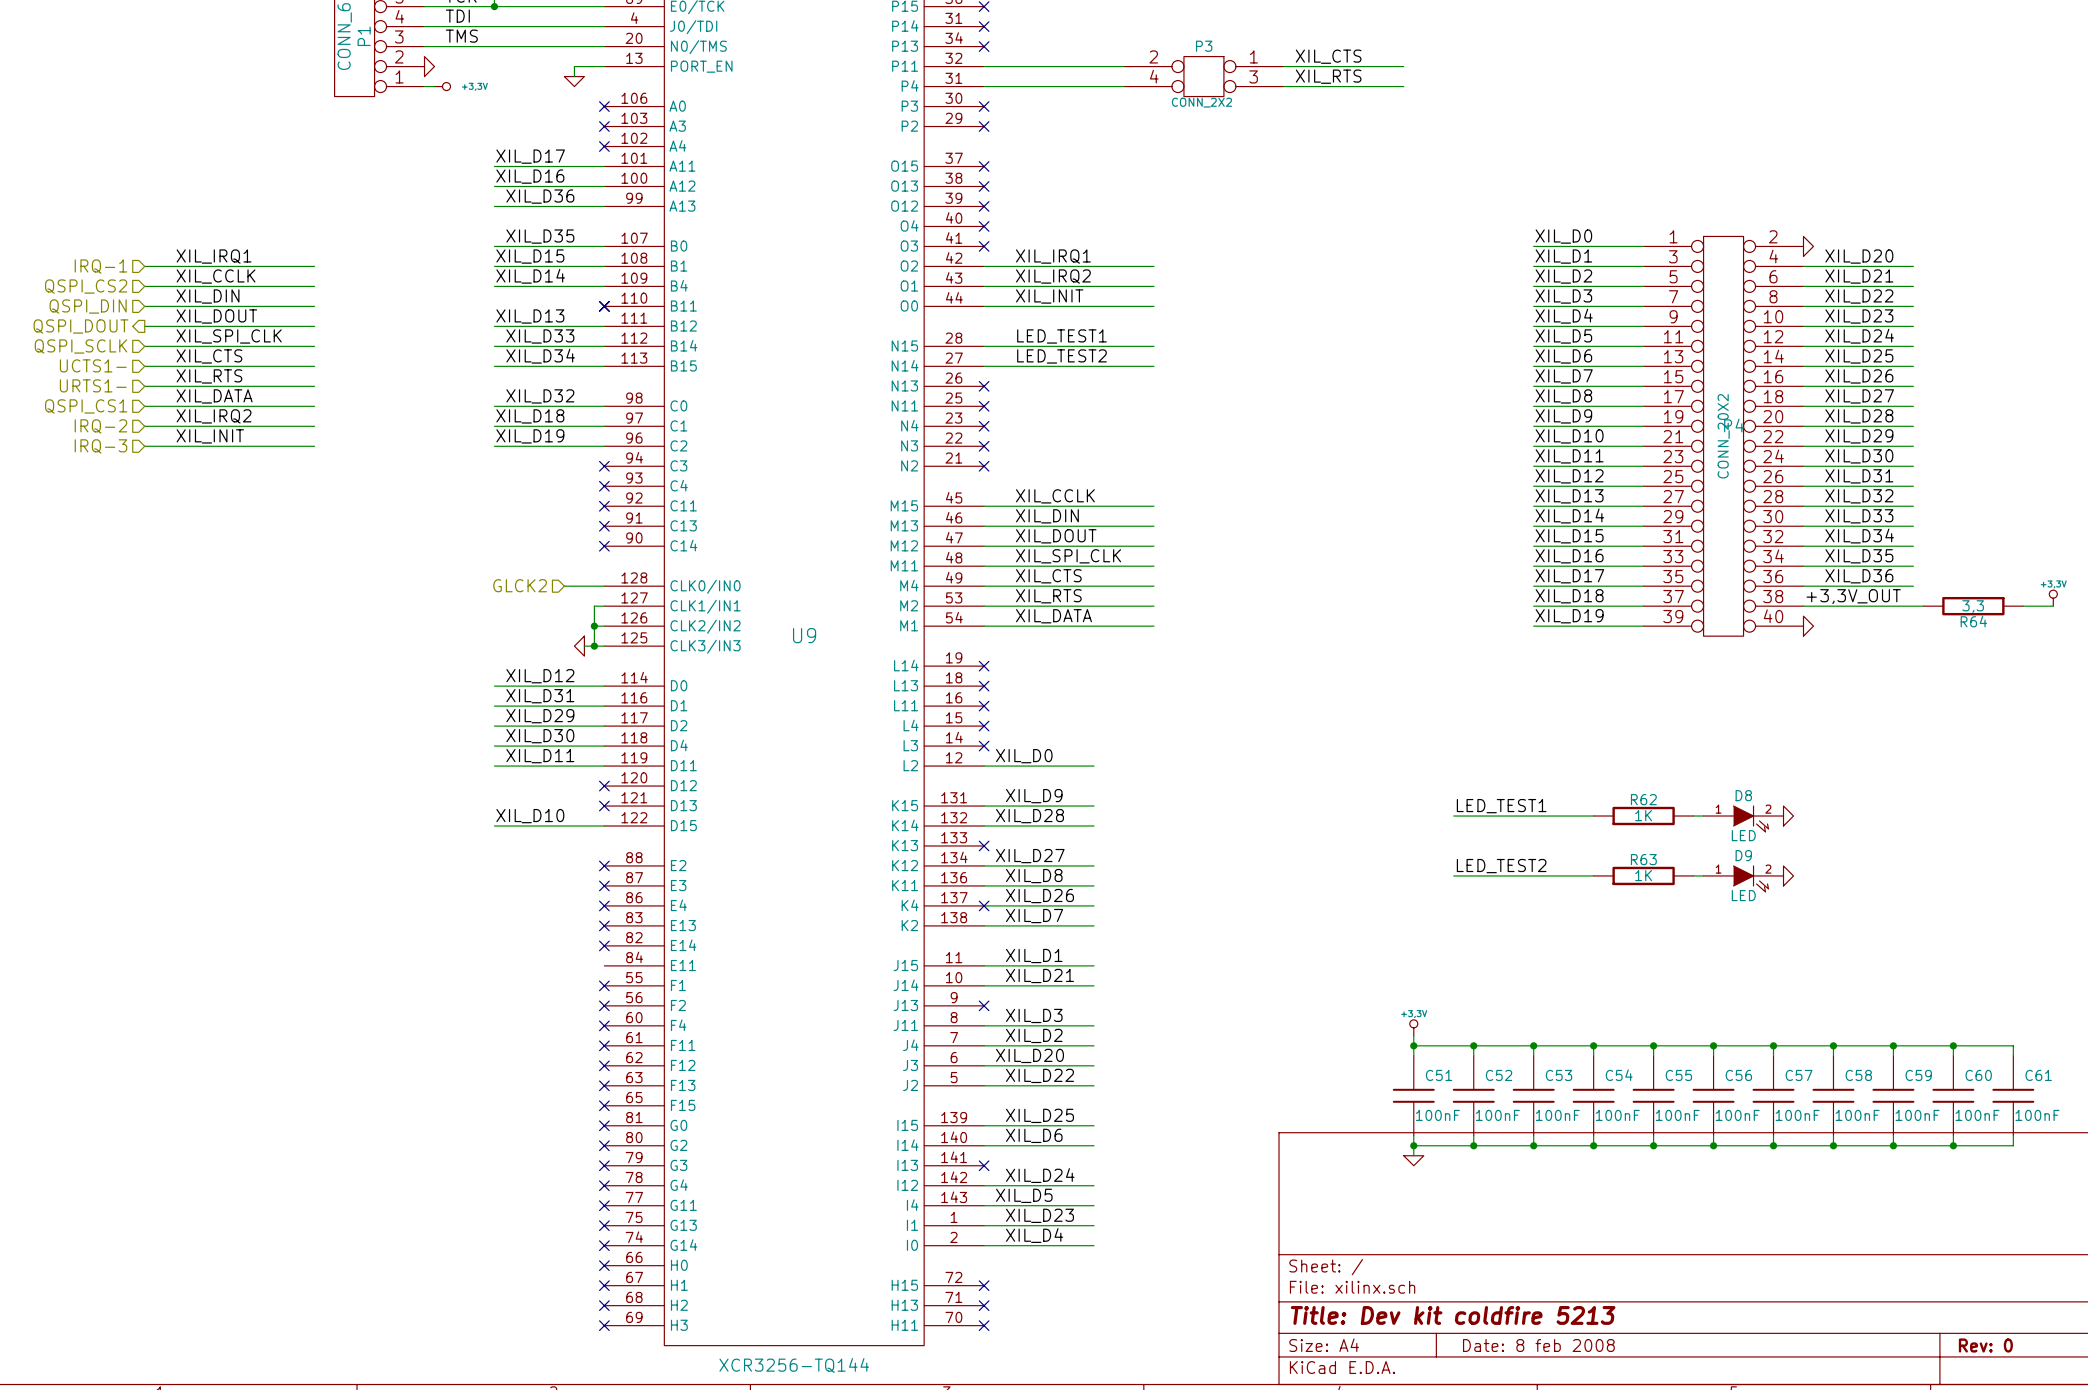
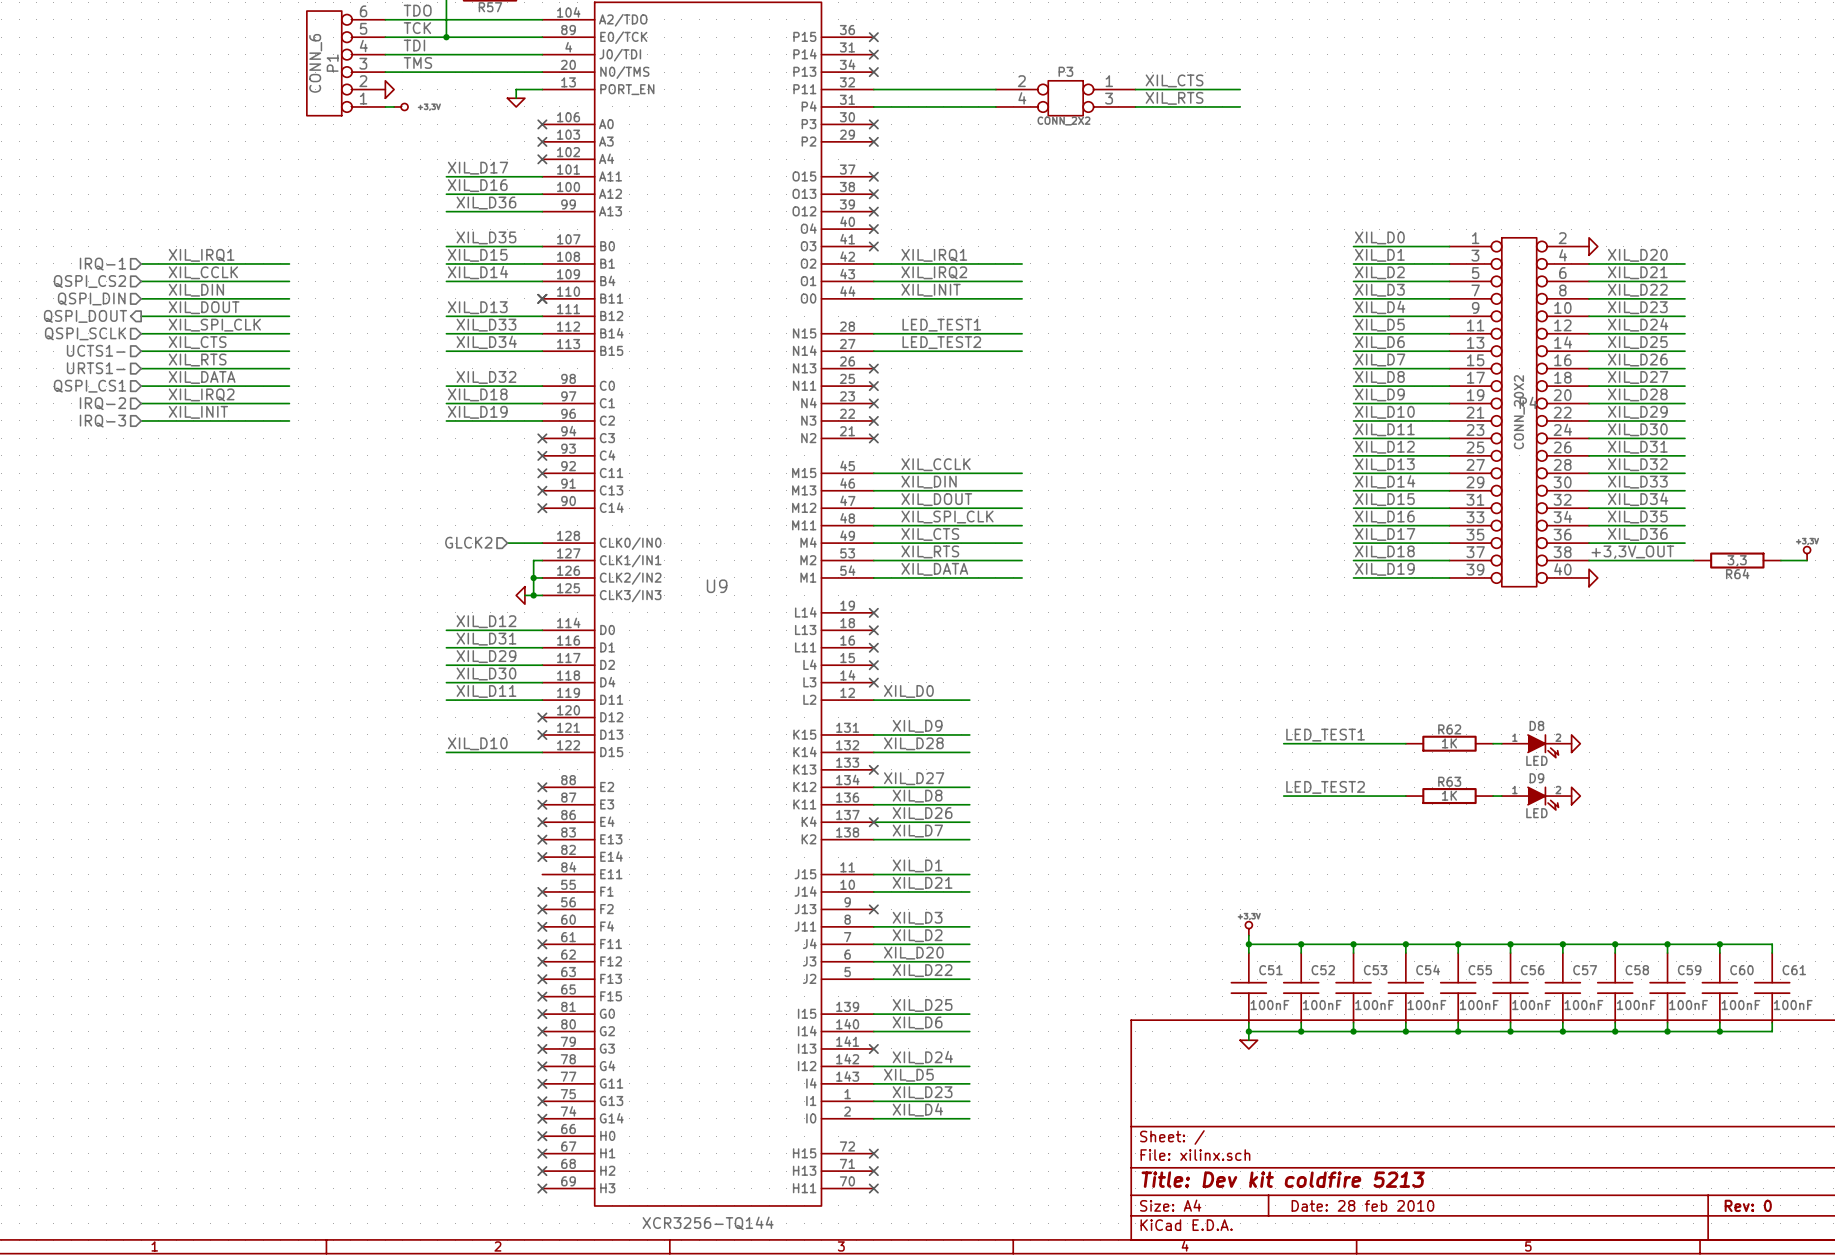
title block: Date: 8 feb 2008 (1538, 1345) -> Date: 28 feb 2010 (1362, 1205)

